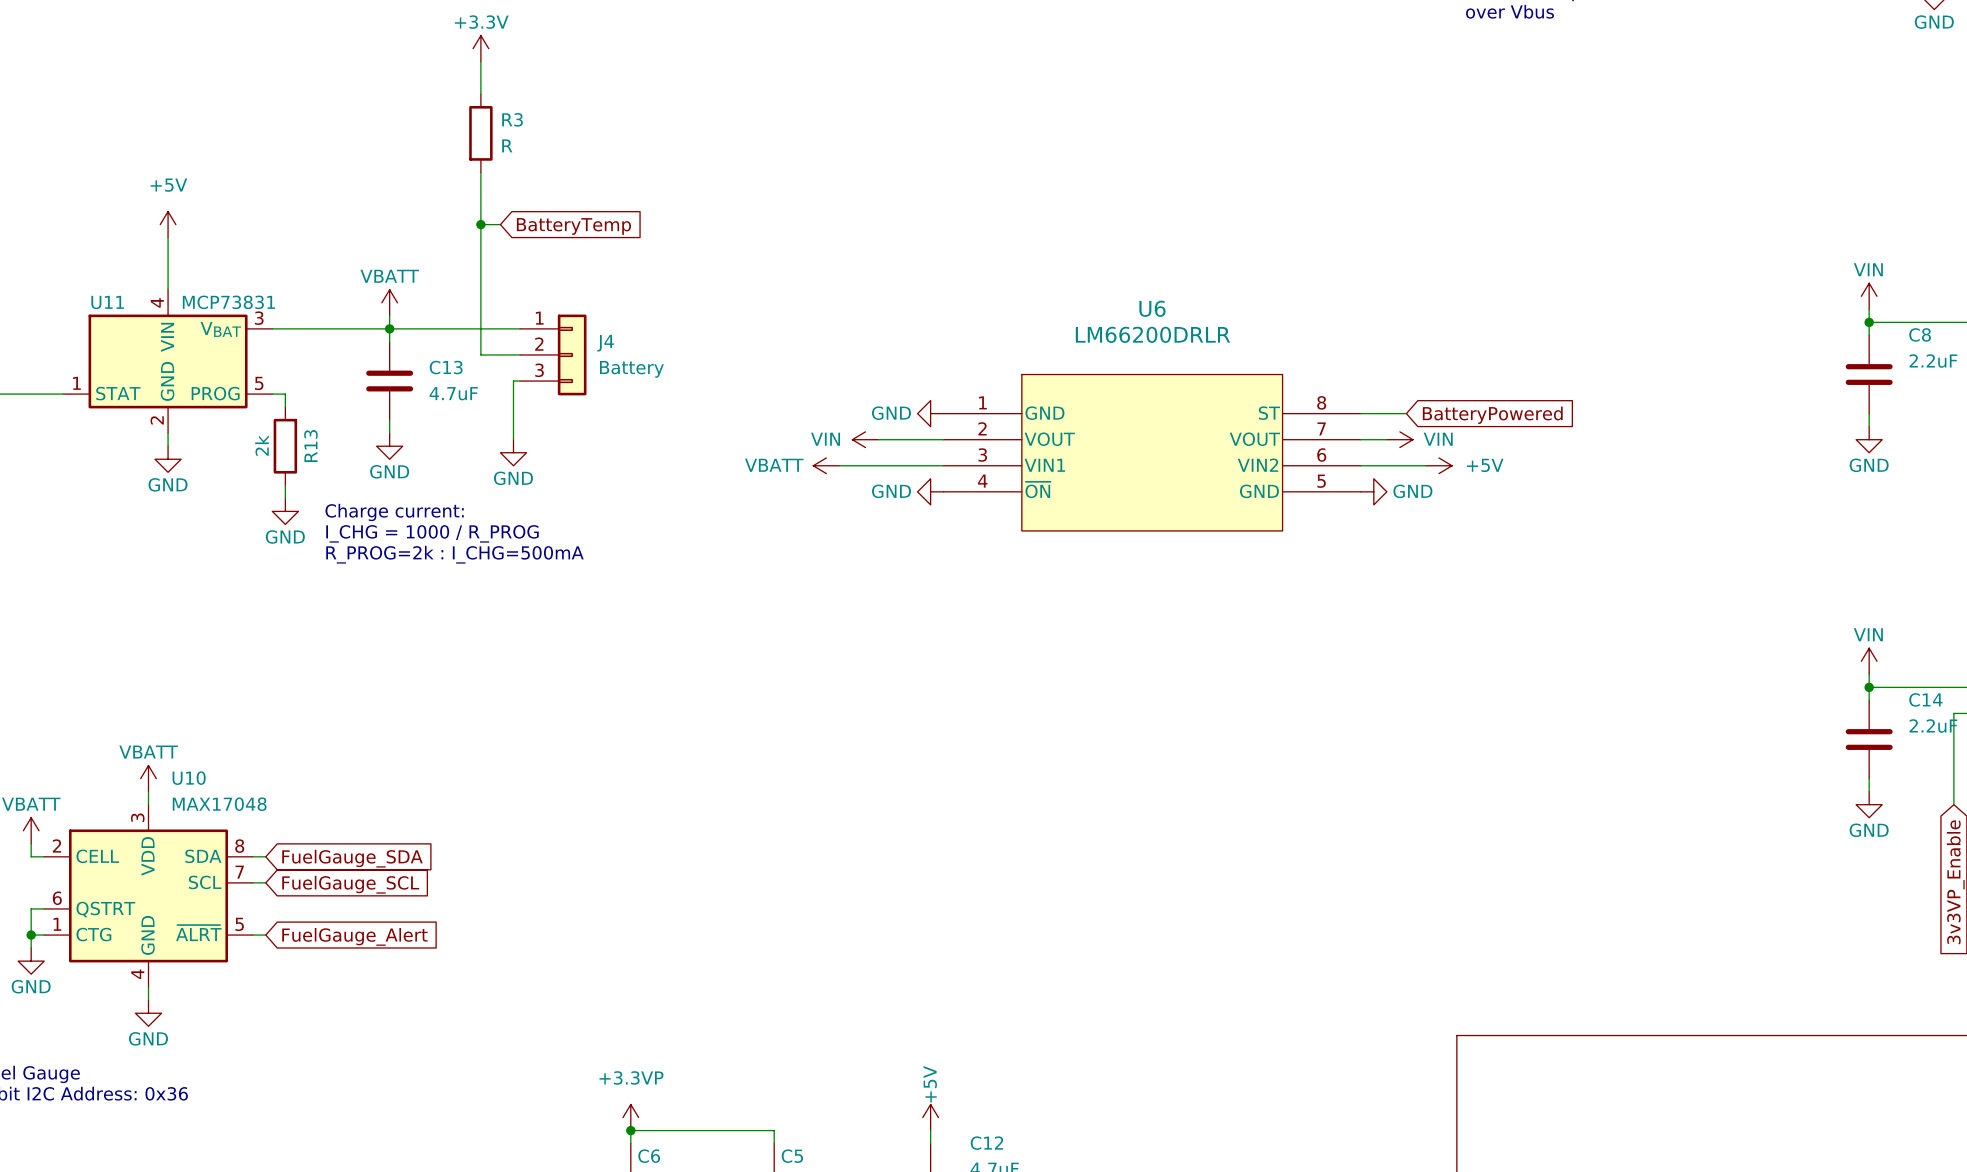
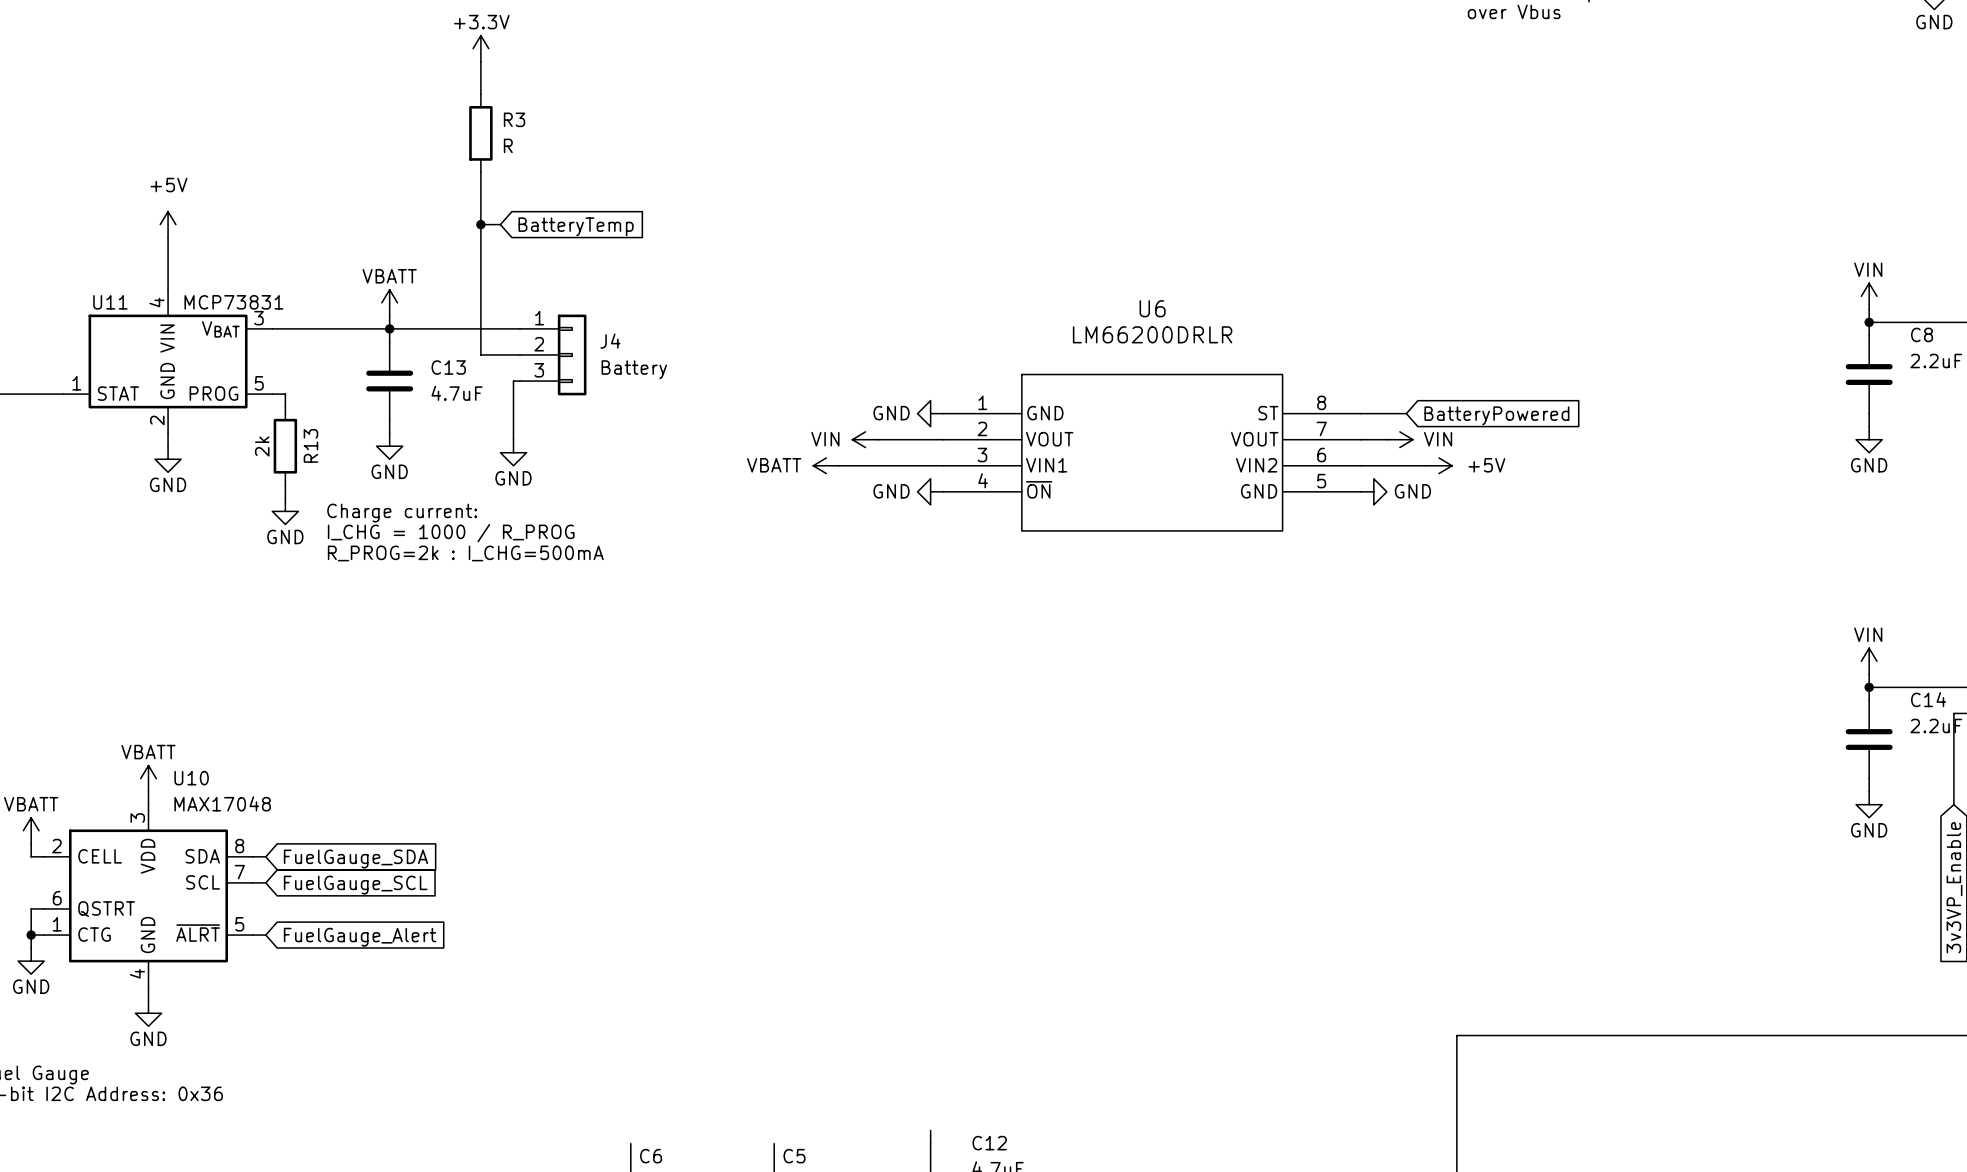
power symbol: +3.3VP (630, 1117) -> none
power symbol: +5V (930, 1117) -> none
junction: (630, 1130) -> none
wire: (630, 1143) (630, 1130) (774, 1130) (774, 1143) -> none

